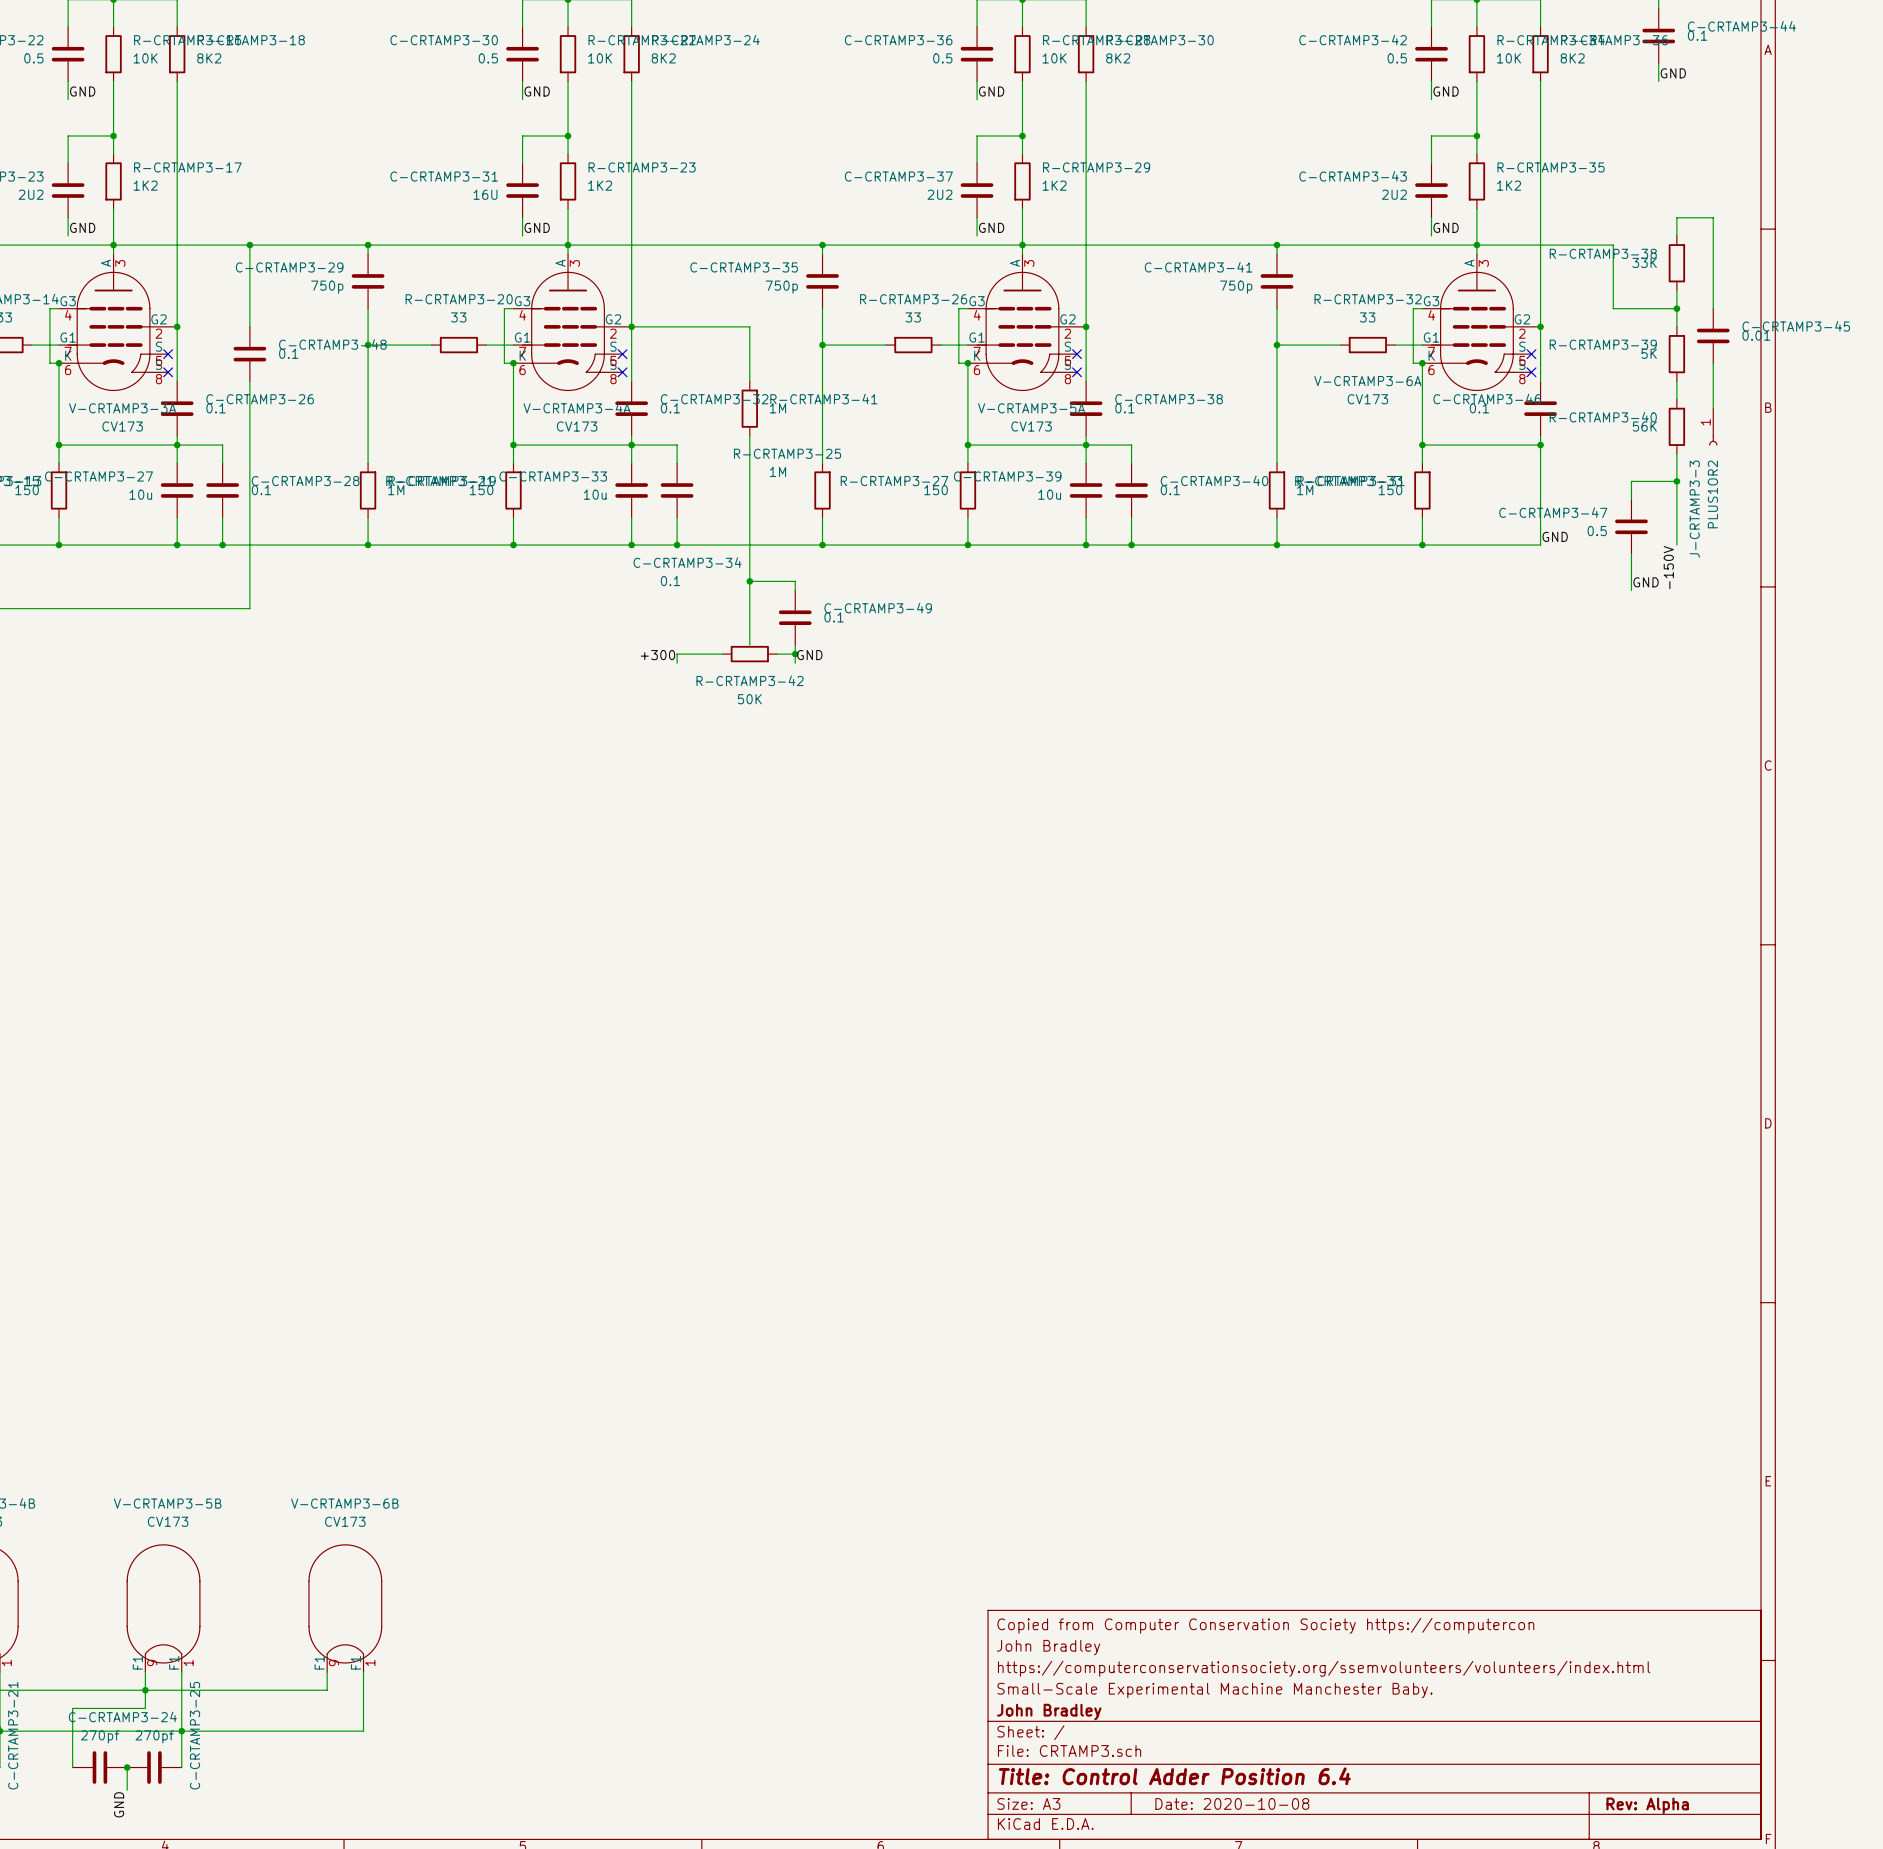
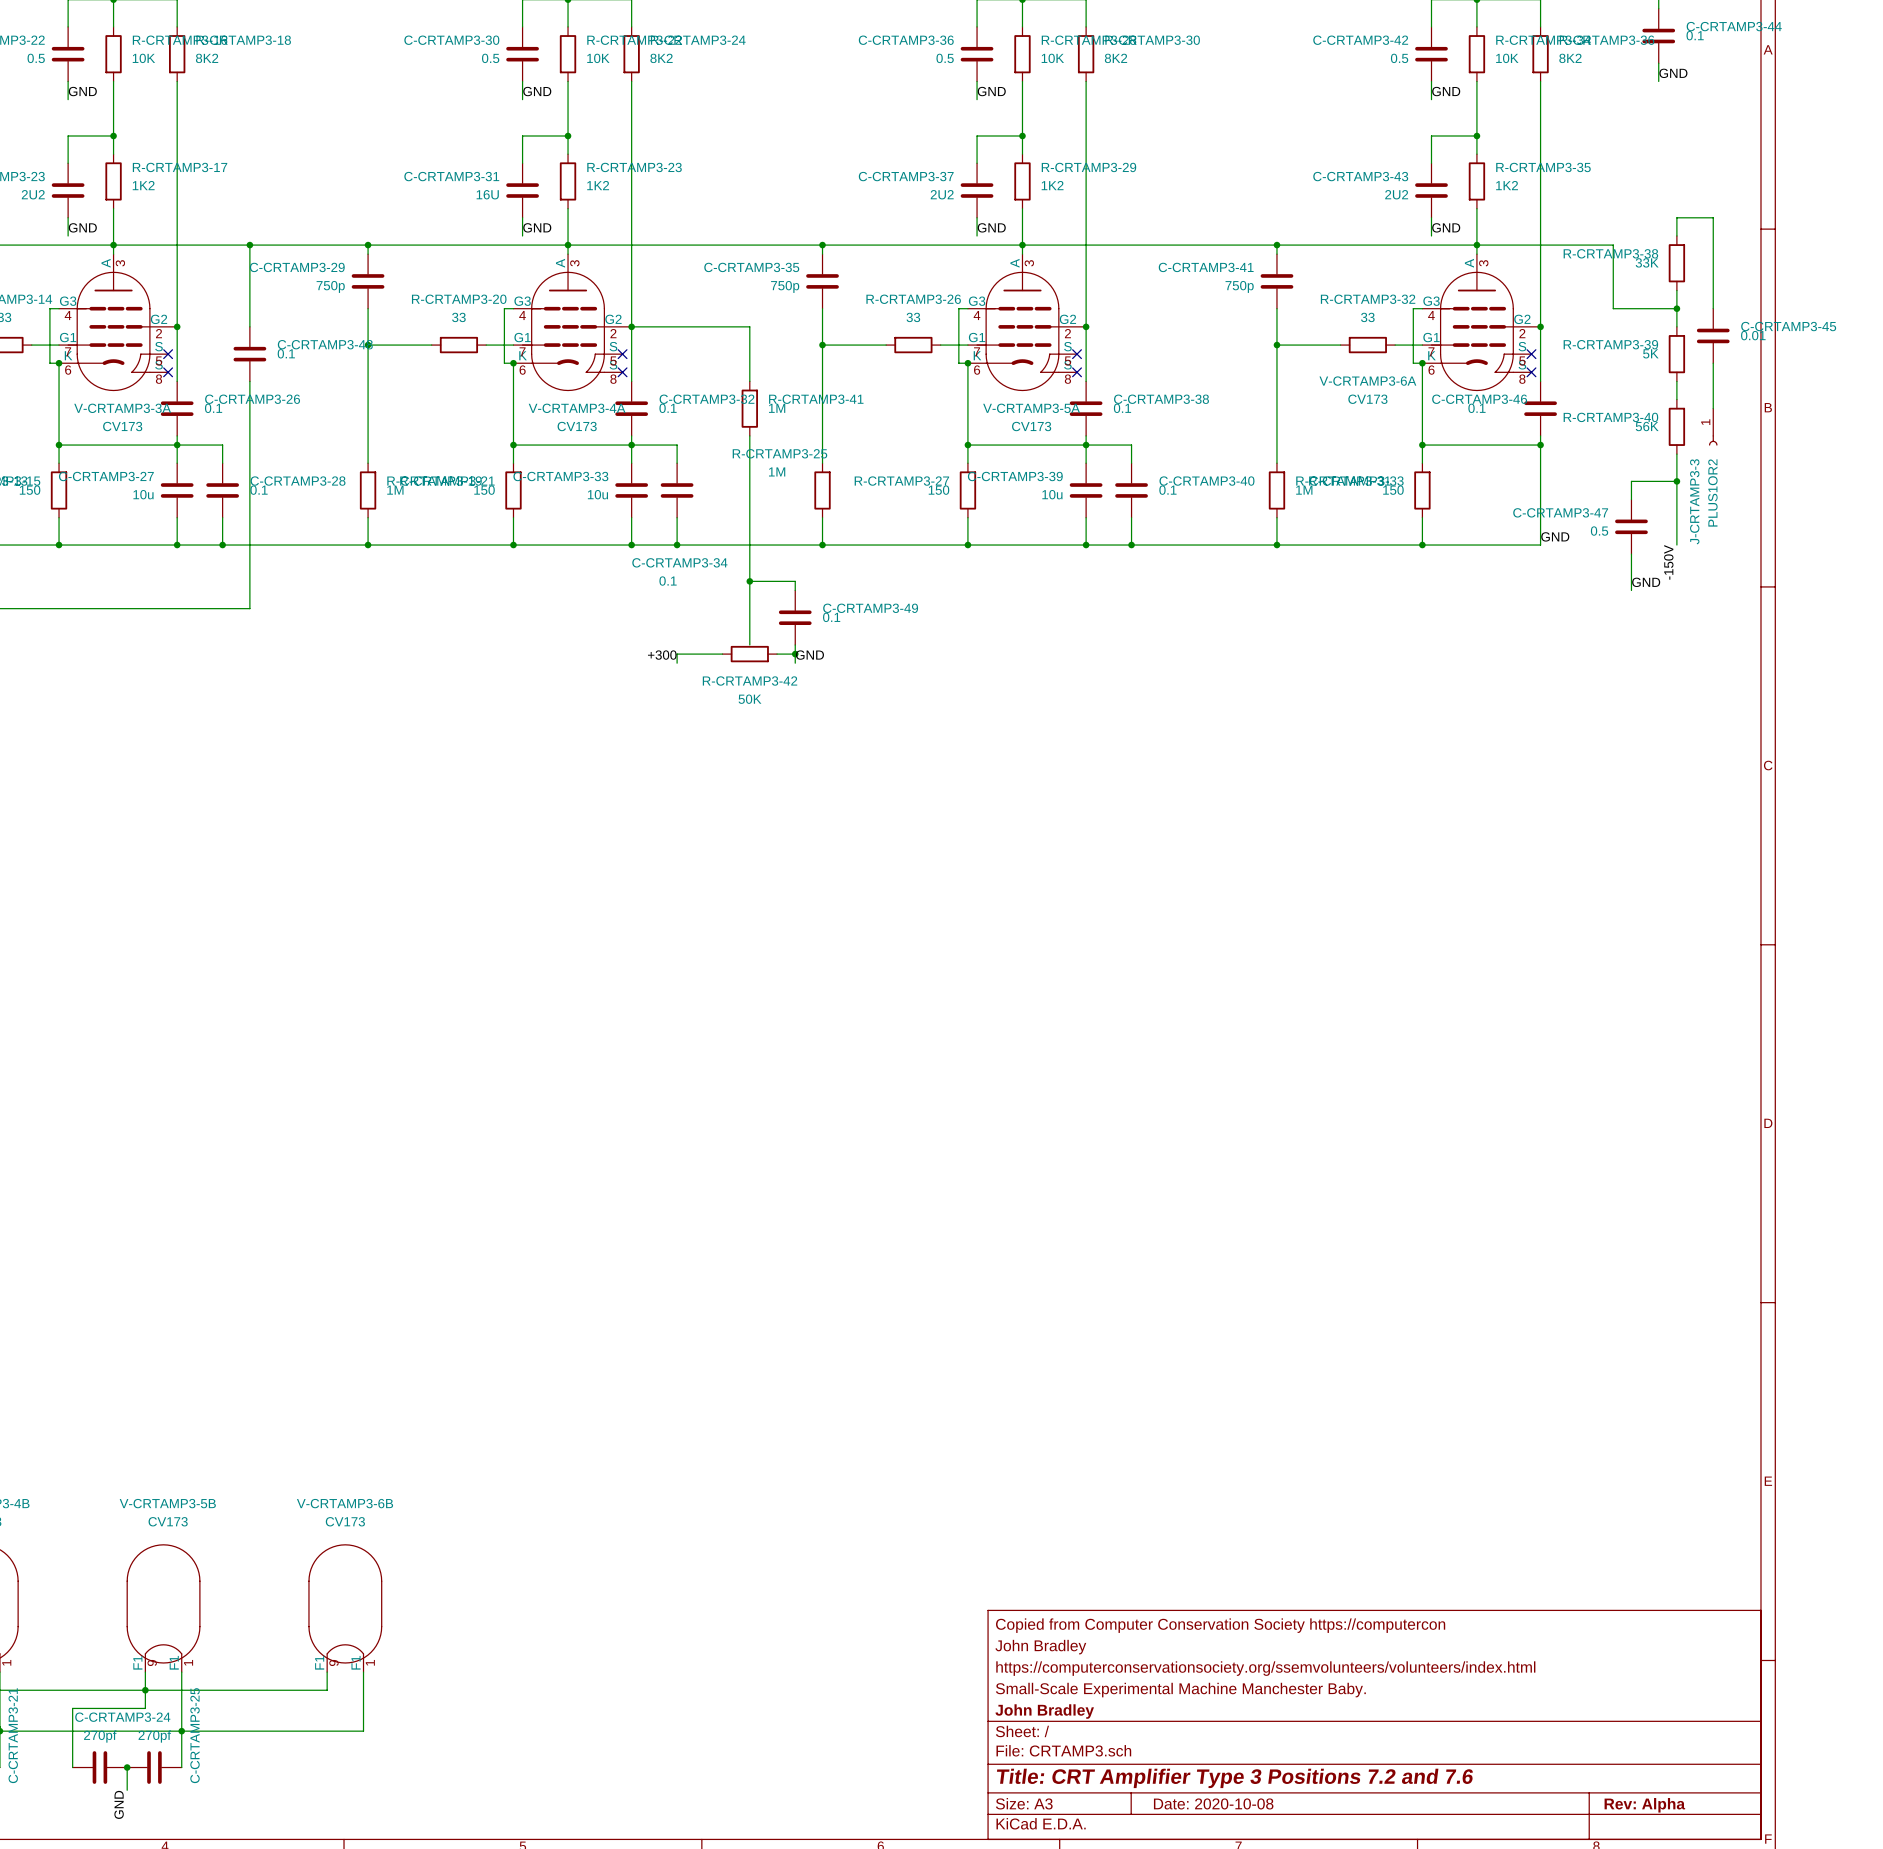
title block: Title: Control Adder Position 6.4 (1174, 1776) -> Title: CRT Amplifier Type 3 Positions 7.2 and 7.6 (1234, 1778)

